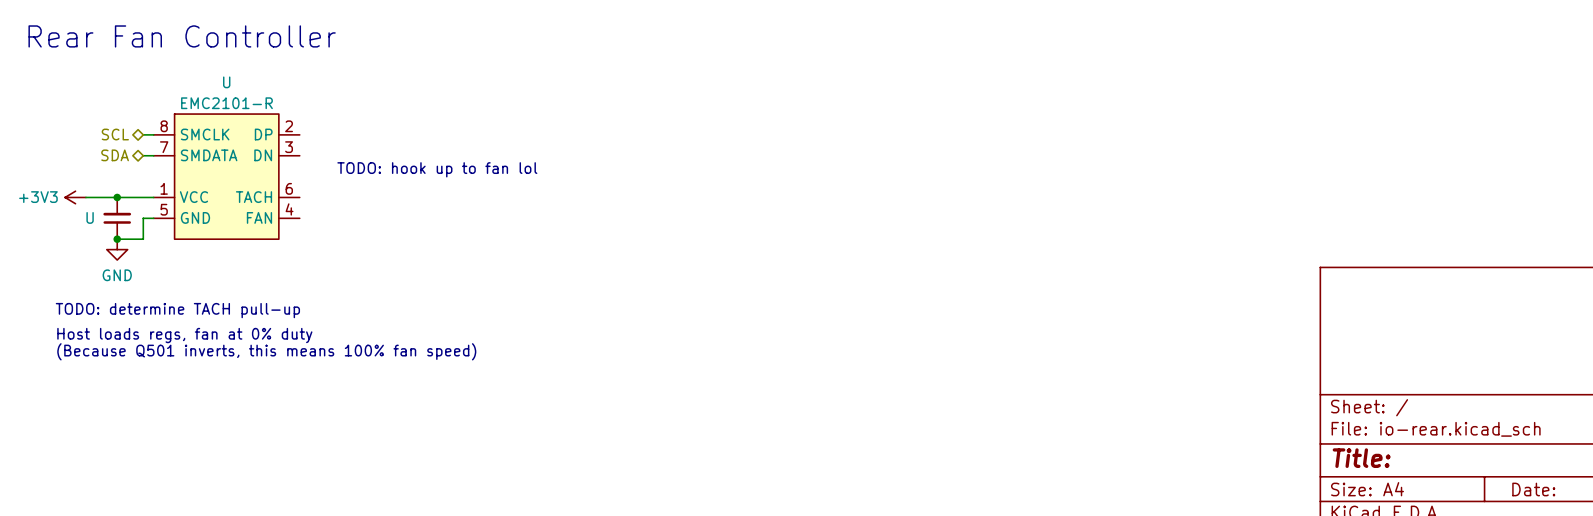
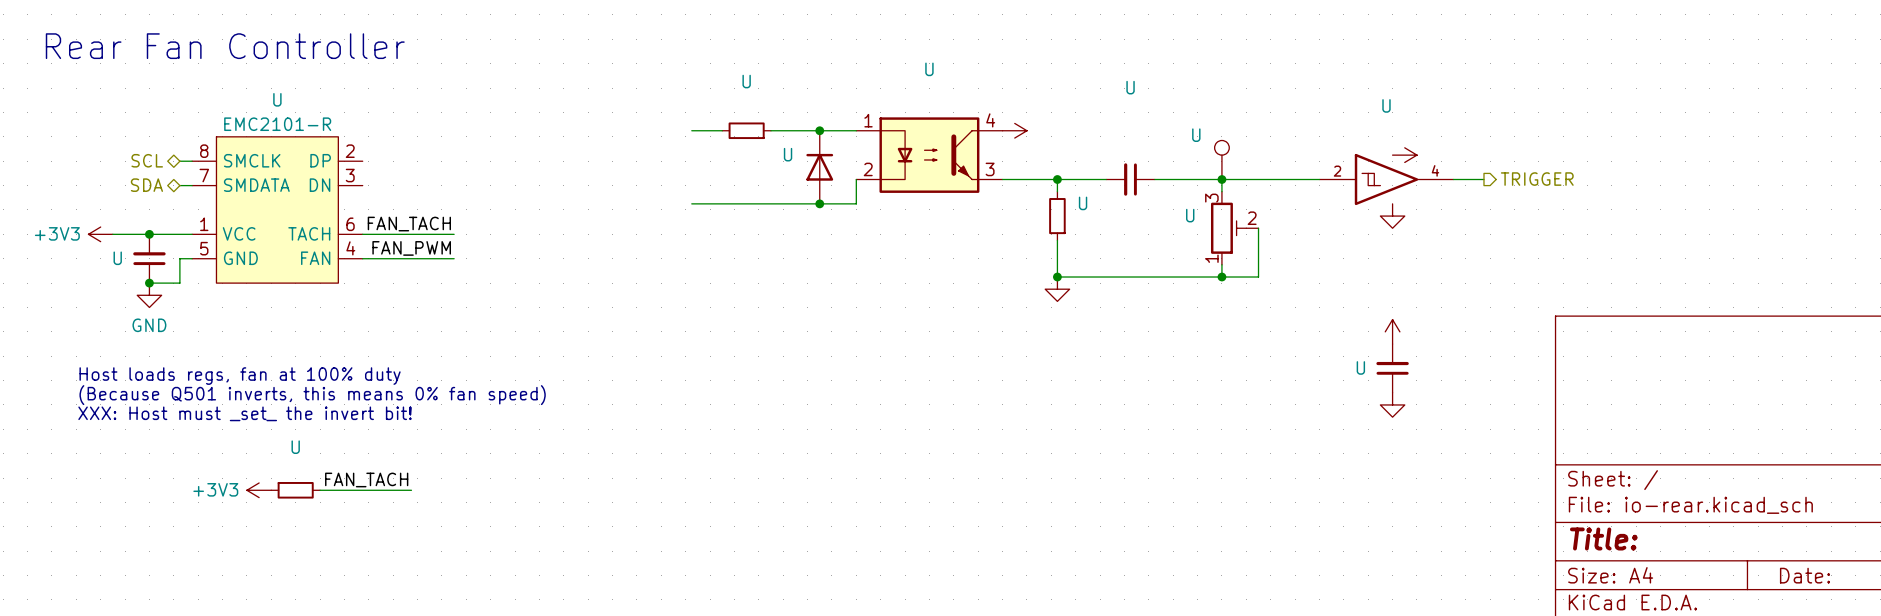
wire: none -> (691, 130) (722, 130)
U: none -> (746, 130)
wire: none -> (771, 130) (856, 130)
junction: none -> (819, 130)
power symbol: none -> (1014, 130)
U: none -> (929, 155)
power symbol: none -> (1404, 155)
U: none -> (1221, 160)
U: none -> (819, 167)
wire: none -> (856, 179) (856, 203) (691, 203)
wire: none -> (1002, 179) (1106, 179)
wire: none -> (1057, 179) (1057, 191)
junction: none -> (1057, 179)
U: none -> (1130, 179)
wire: none -> (1154, 179) (1319, 179)
wire: none -> (1221, 179) (1221, 191)
junction: none -> (1221, 179)
U: none -> (1386, 179)
wire: none -> (1453, 179) (1483, 179)
hierarchical label: none -> TRIGGER (1537, 179)
text: TODO: hook up to fan lol (437, 169) -> none
junction: none -> (819, 203)
U: none -> (1057, 216)
power symbol: none -> (1392, 216)
label: none -> FAN_TACH (409, 224)
U: none -> (1234, 228)
wire: none -> (1258, 228) (1258, 277) (1057, 277) (1057, 240)
wire: none -> (362, 234) (454, 234)
label: none -> FAN_PWM (411, 248)
wire: none -> (362, 258) (454, 258)
wire: none -> (1221, 264) (1221, 277)
junction: none -> (1057, 277)
junction: none -> (1221, 277)
power symbol: none -> (1057, 289)
power symbol: none -> (1392, 331)
text: TODO: determine TACH pull-up (177, 310) -> Host loads regs, fan at 100% duty (240, 376)
U: none -> (1392, 368)
text: Host loads regs, fan at 0% duty (184, 335) -> (Because Q501 inverts, this means 0% fan speed) (312, 395)
power symbol: none -> (1392, 404)
text: (Because Q501 inverts, this means 100% fan speed) (266, 351) -> XXX: Host must _set_ the invert bit! (244, 413)
label: none -> FAN_TACH (366, 479)
power symbol: none -> +3V3 (259, 490)
U: none -> (295, 490)
wire: none -> (320, 490) (411, 490)

